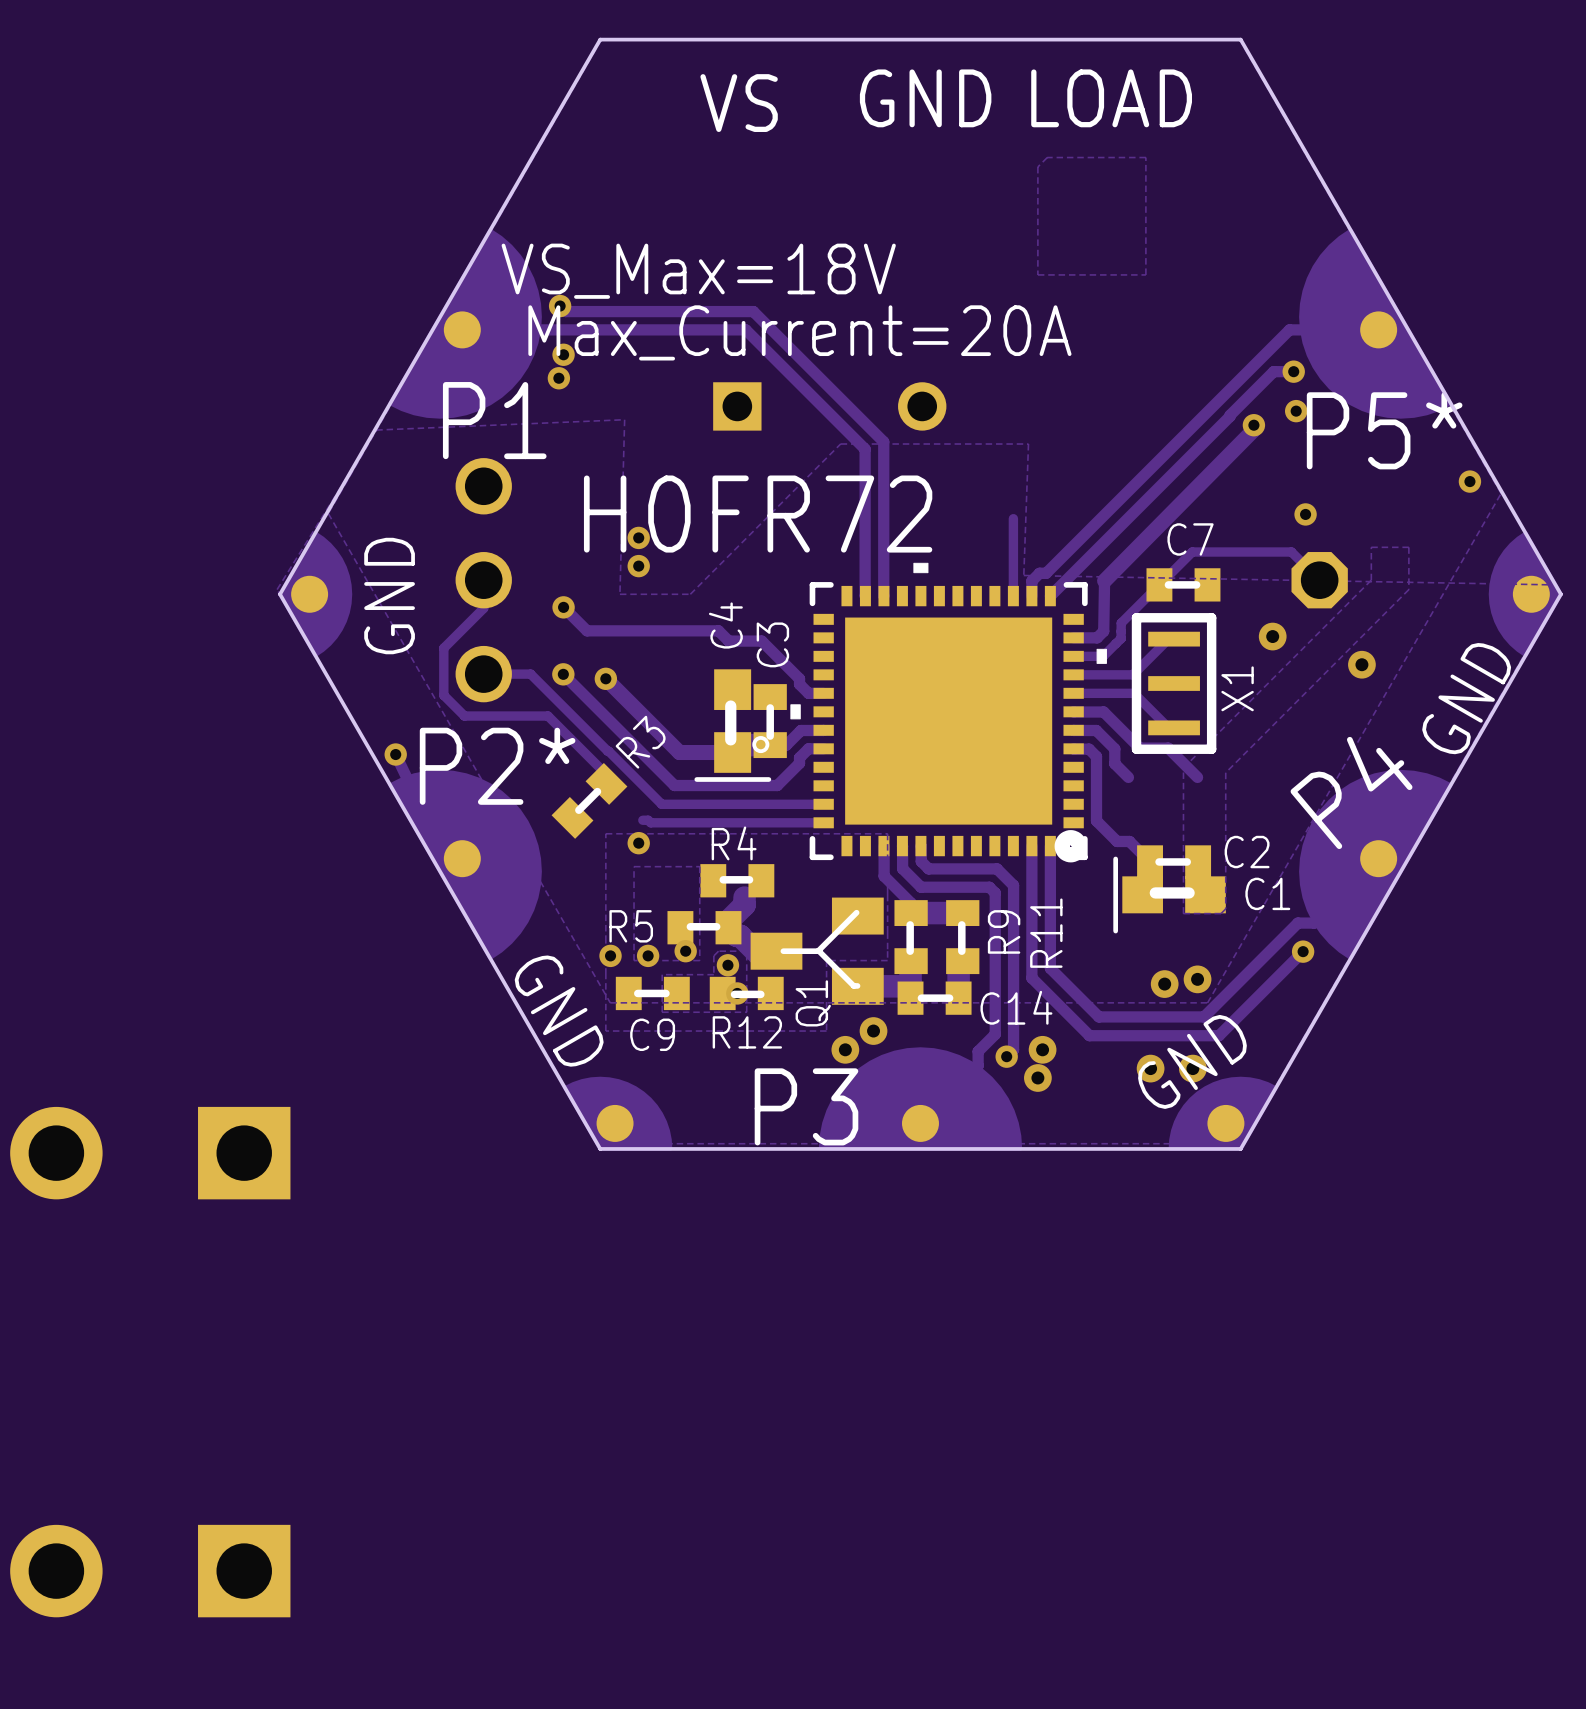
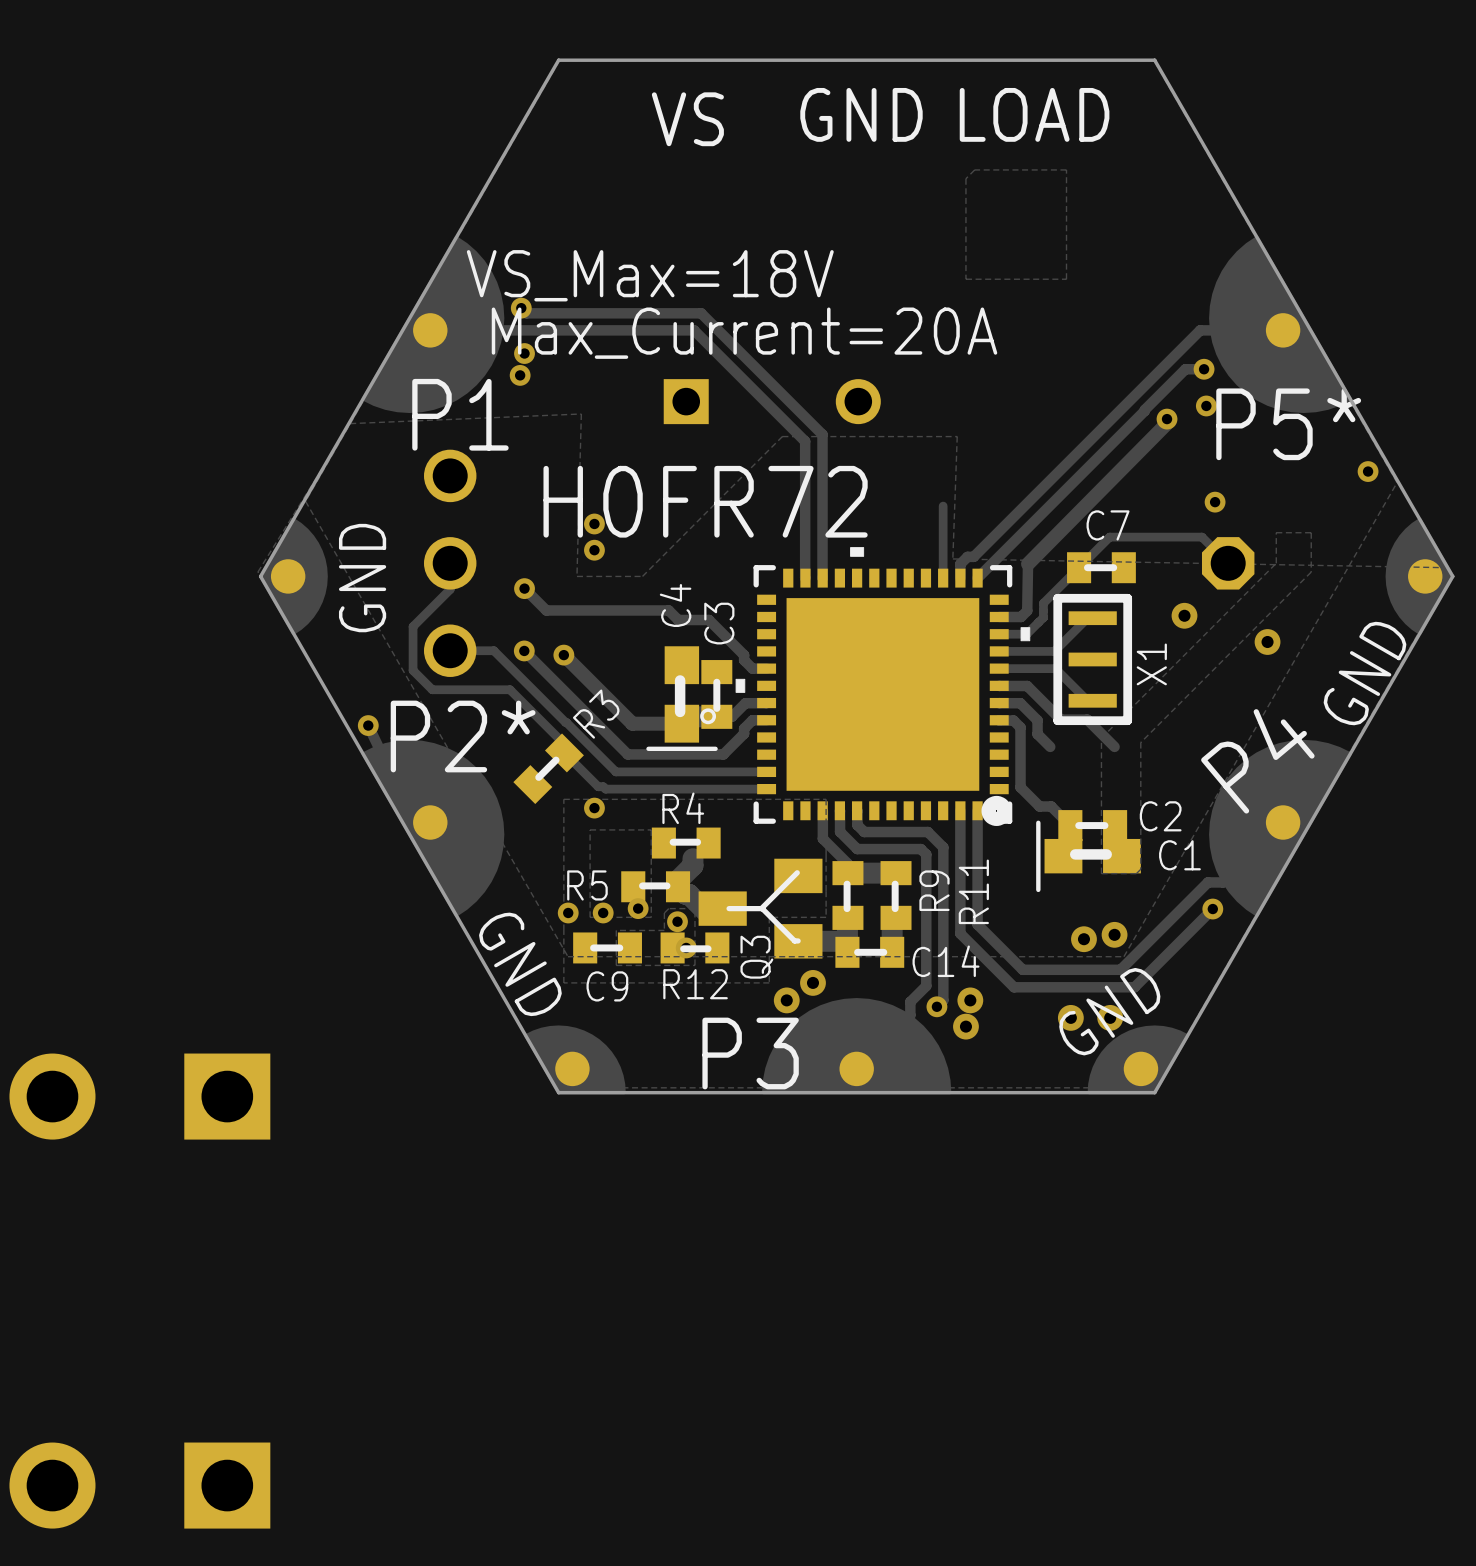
track: none -> (564, 744) (564, 752) (598, 786)
Q1 name: Q1 (813, 1003) -> Q3 (756, 957)

